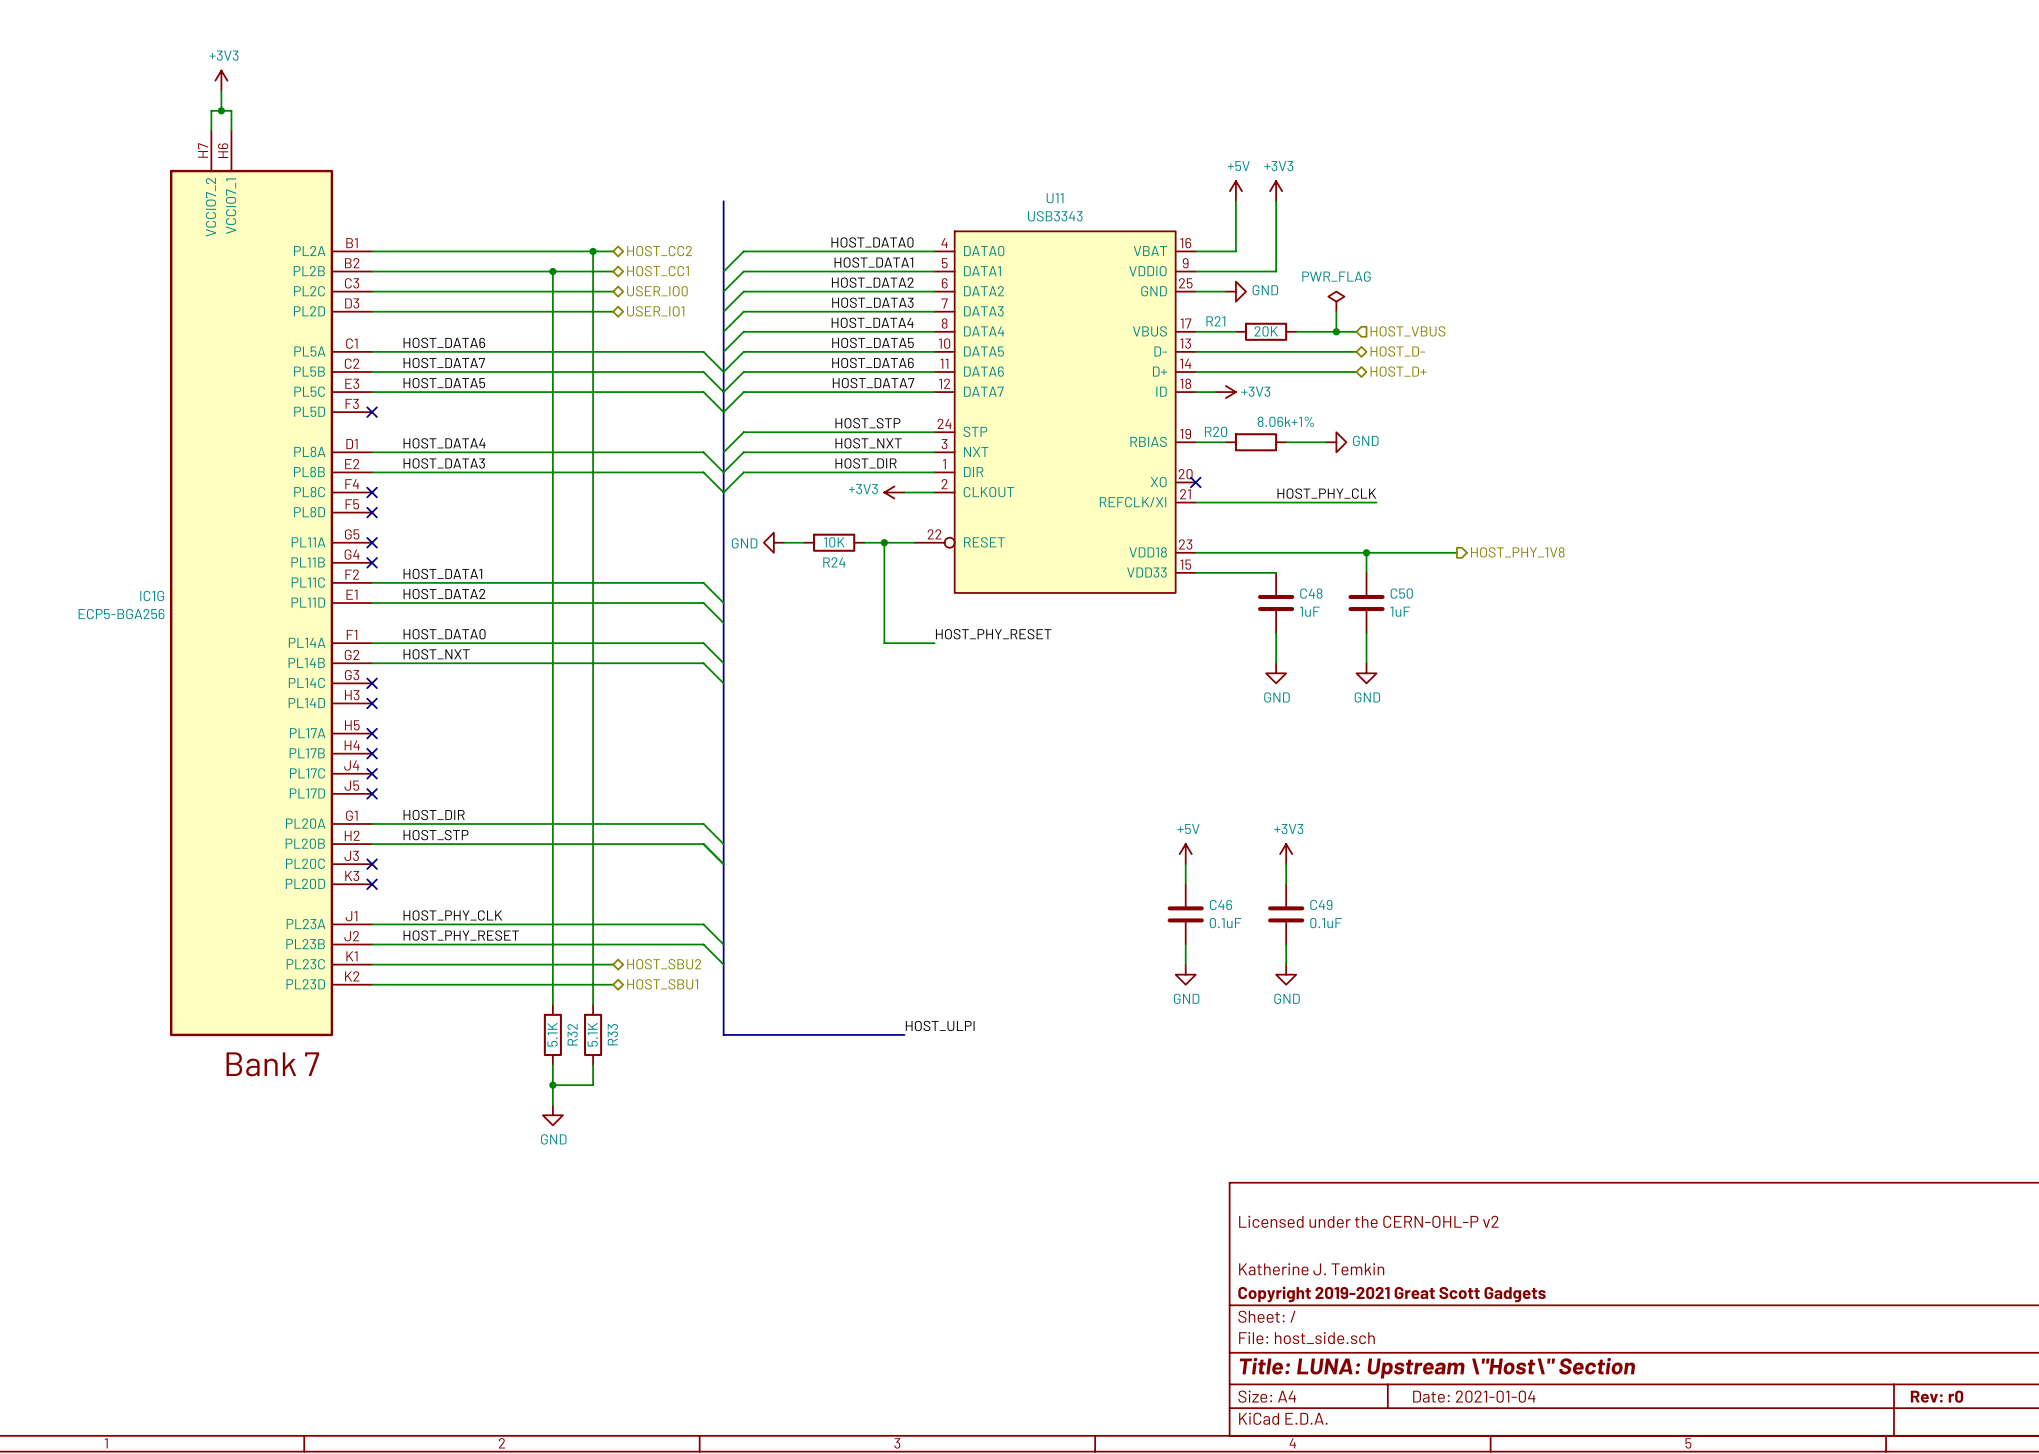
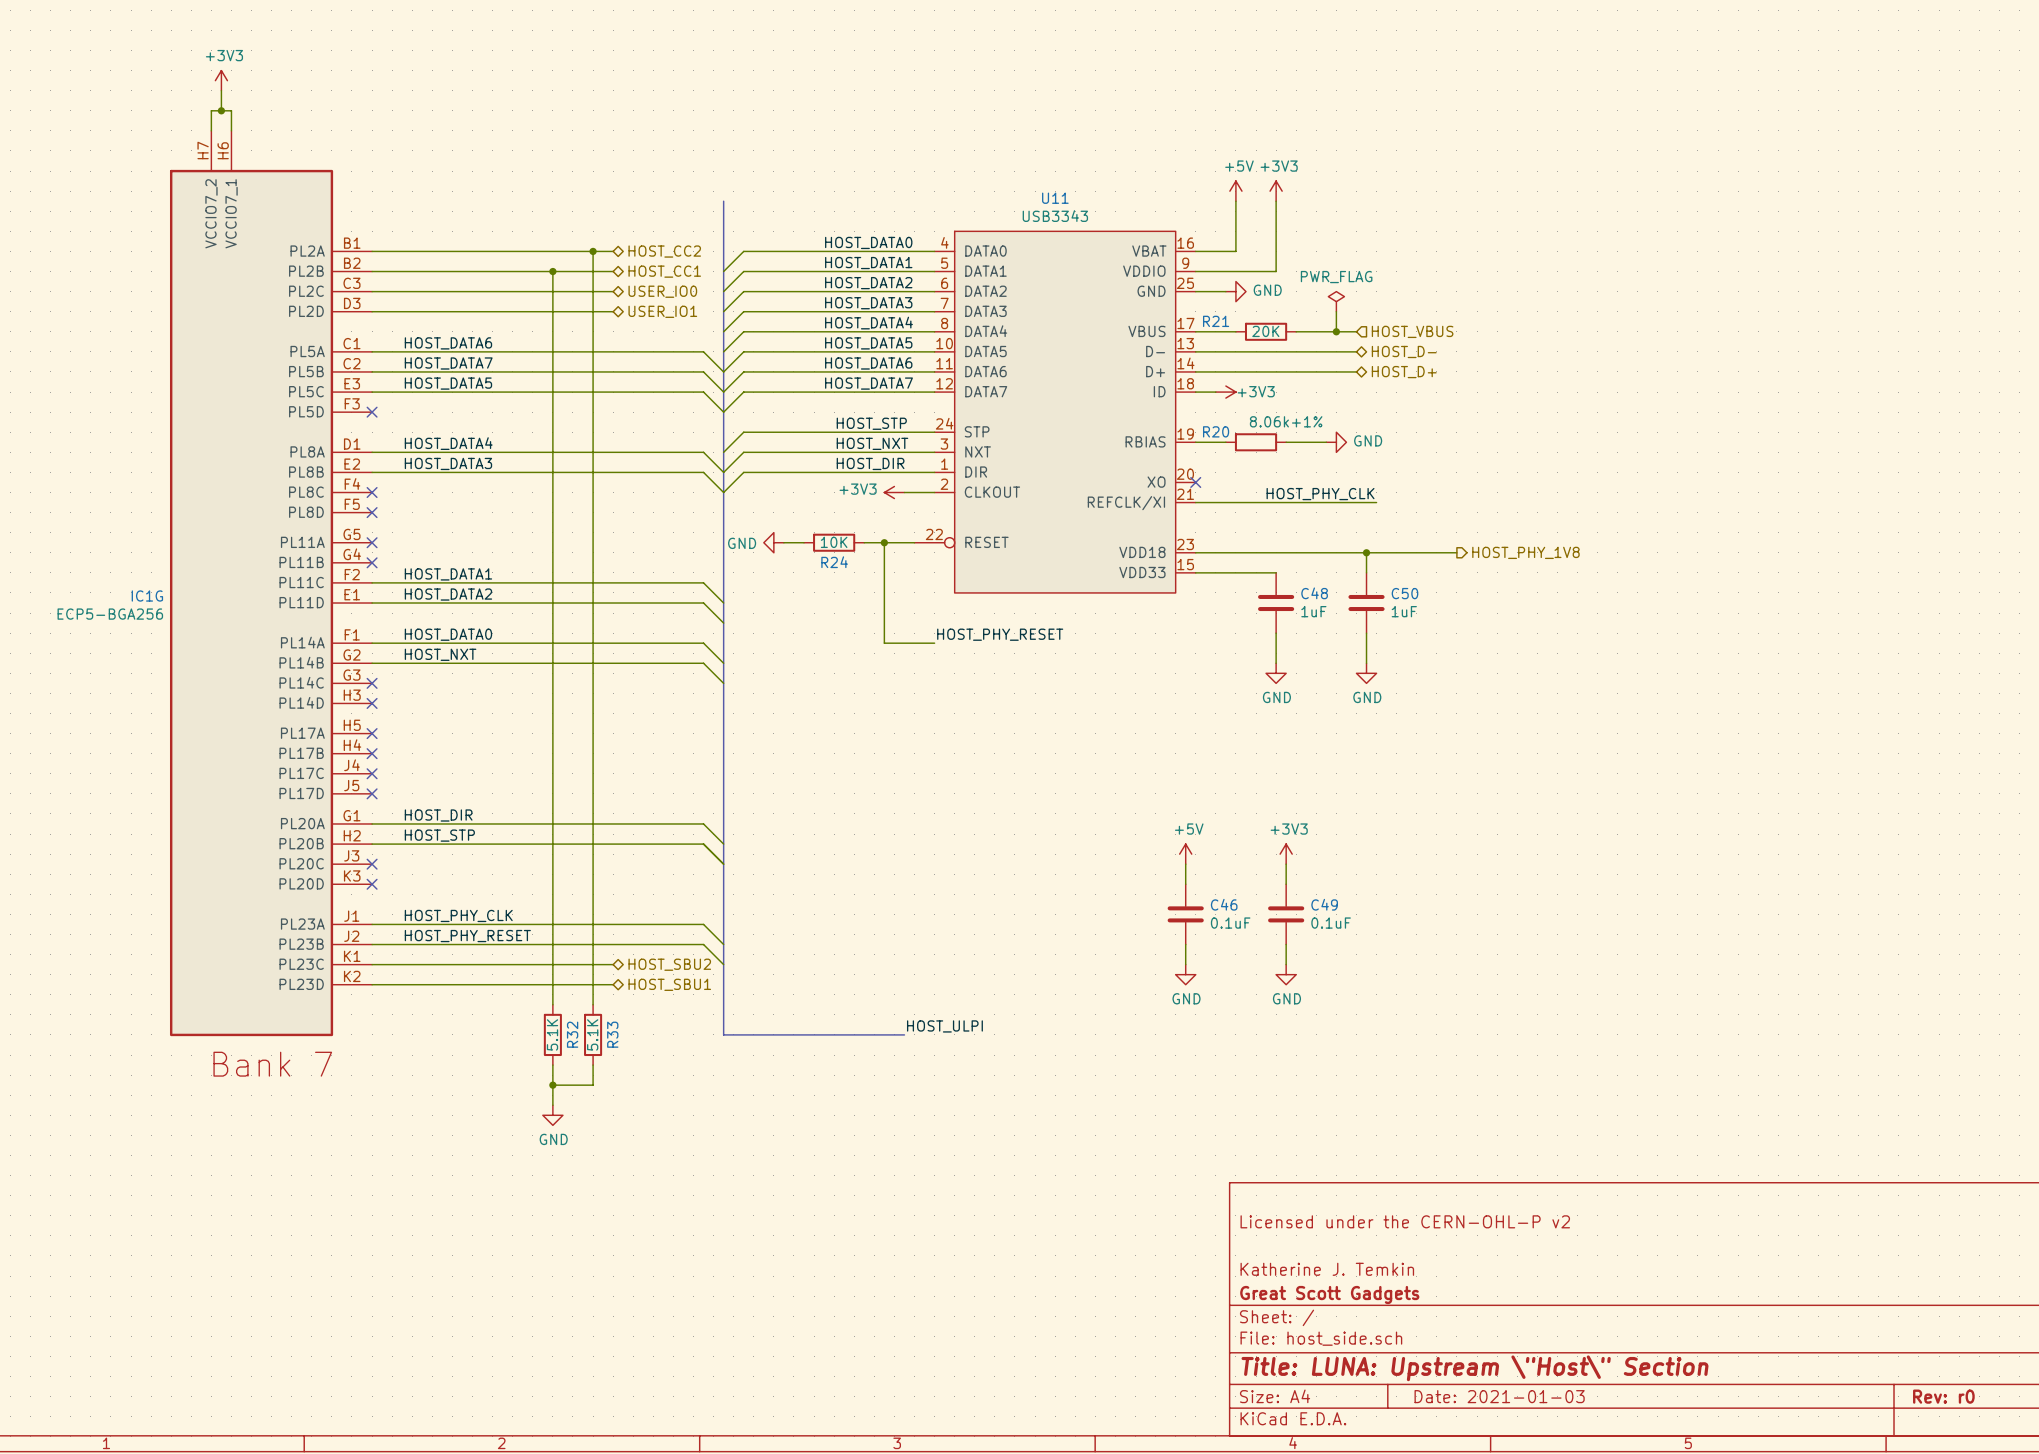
title block: Copyright 2019-2021 Great Scott Gadgets (1392, 1294) -> Great Scott Gadgets (1329, 1294)
title block: Date: 2021-01-04 (1474, 1396) -> Date: 2021-01-03 (1499, 1396)

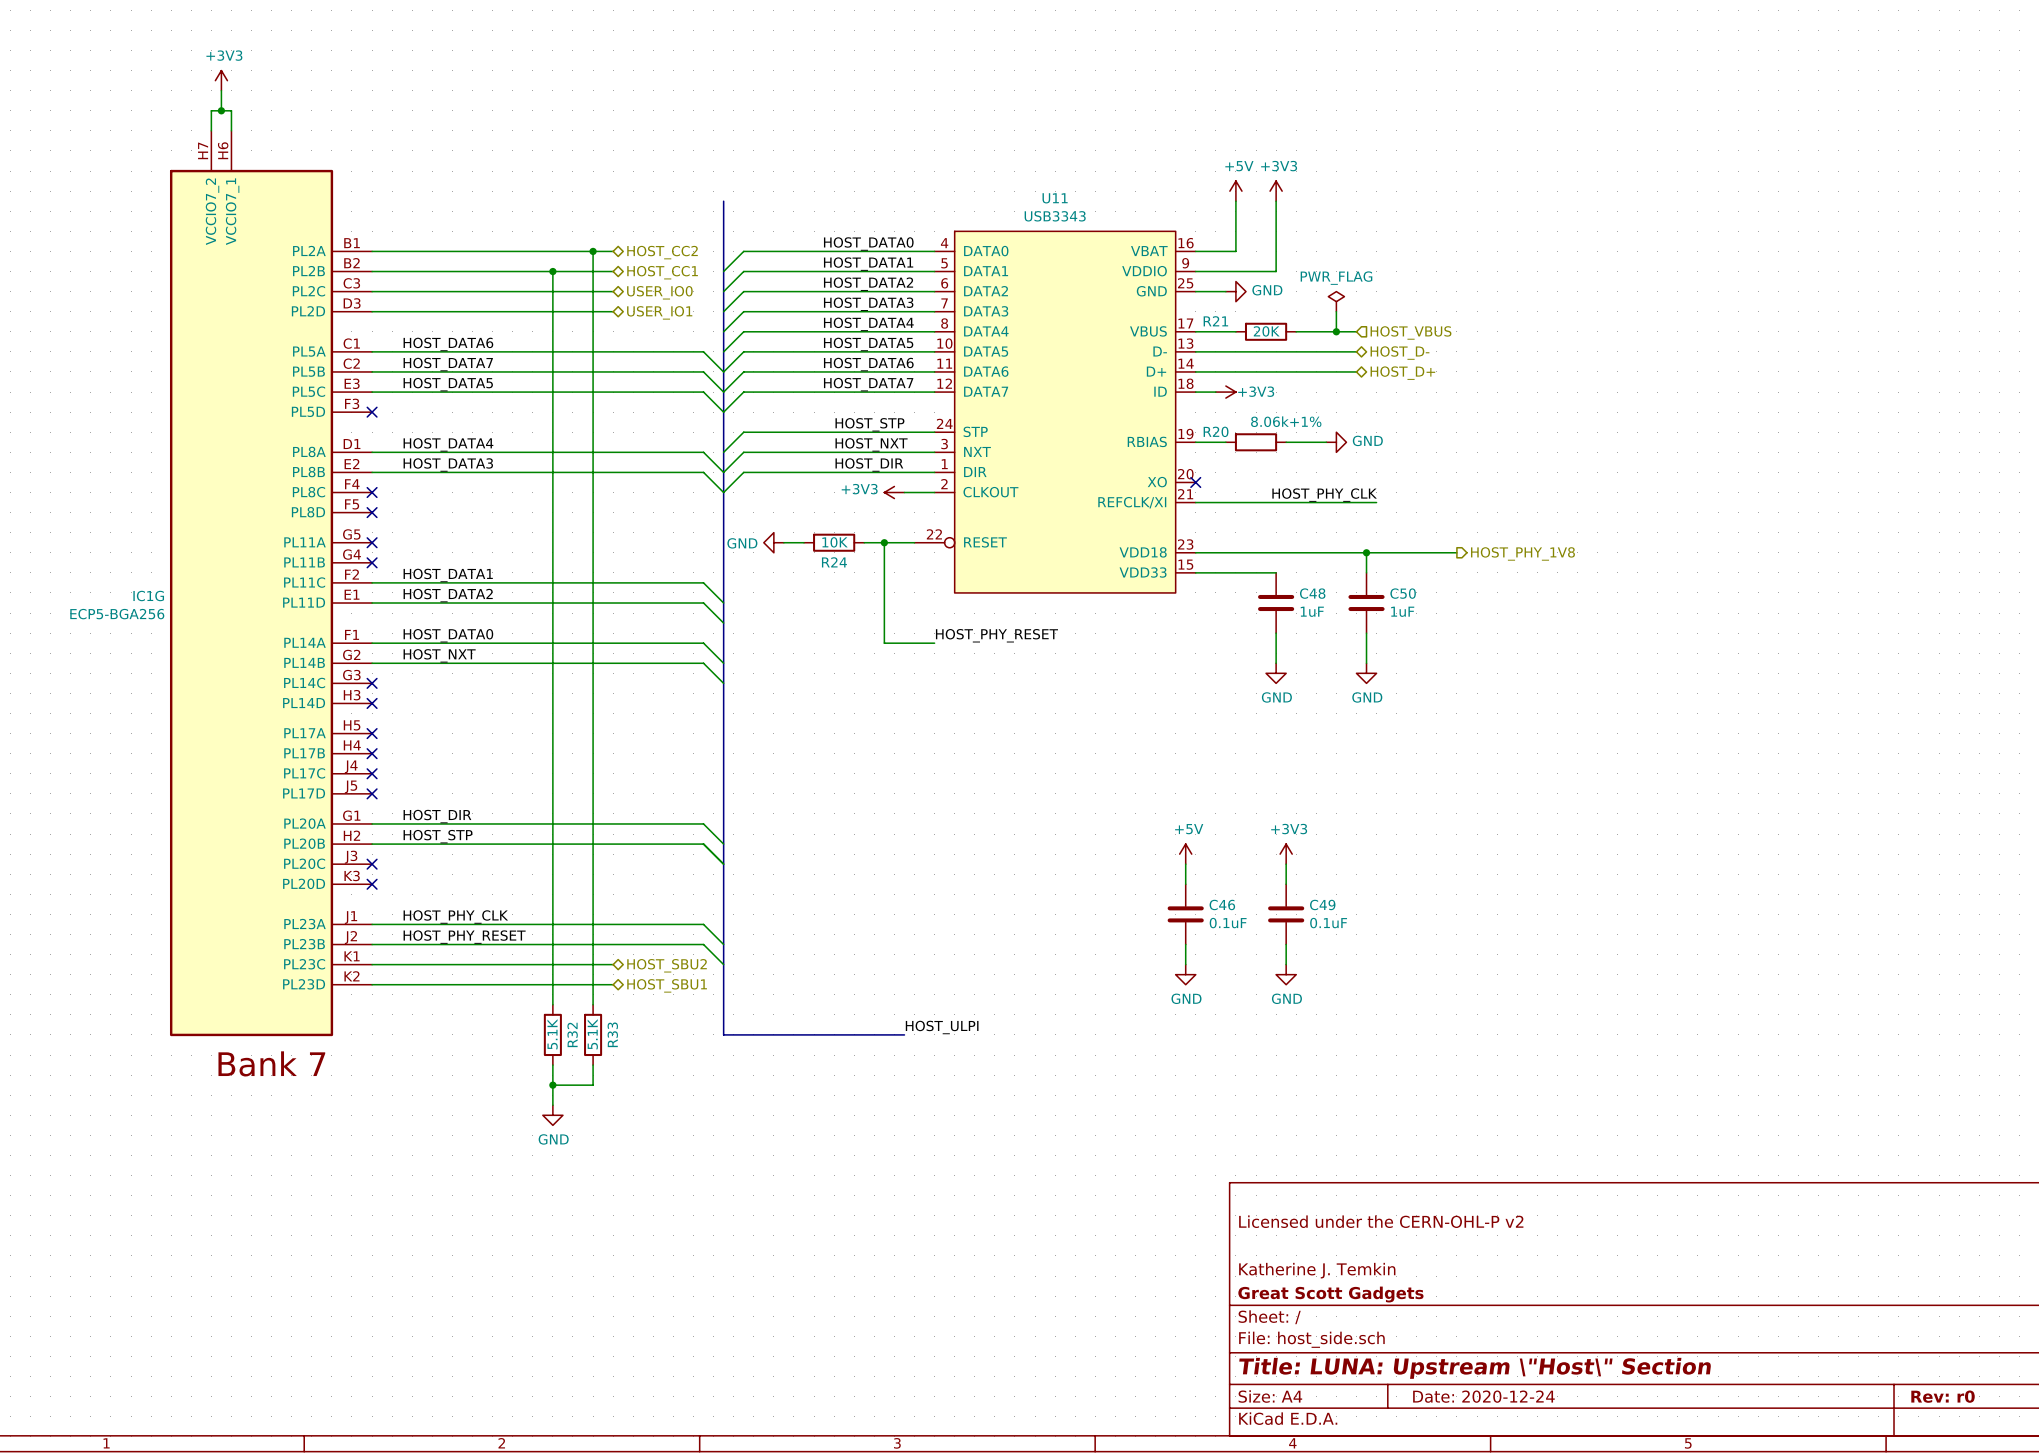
title block: Date: 2021-01-03 (1499, 1396) -> Date: 2020-12-24 (1483, 1396)

